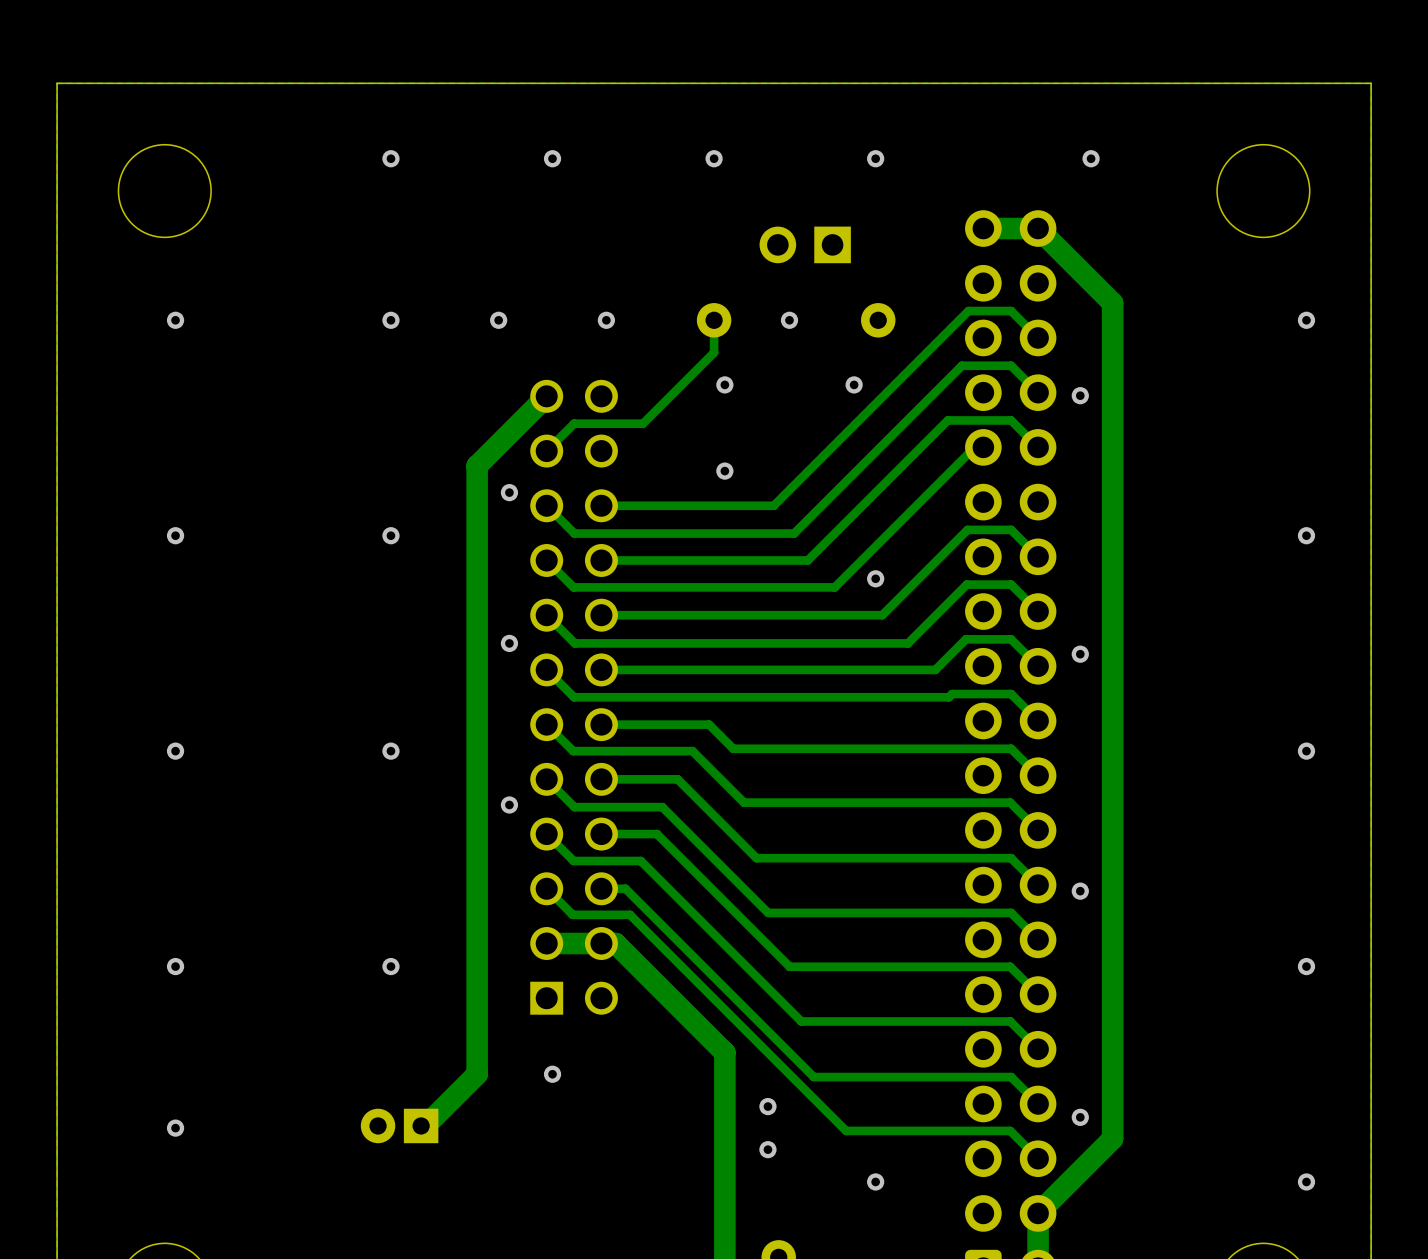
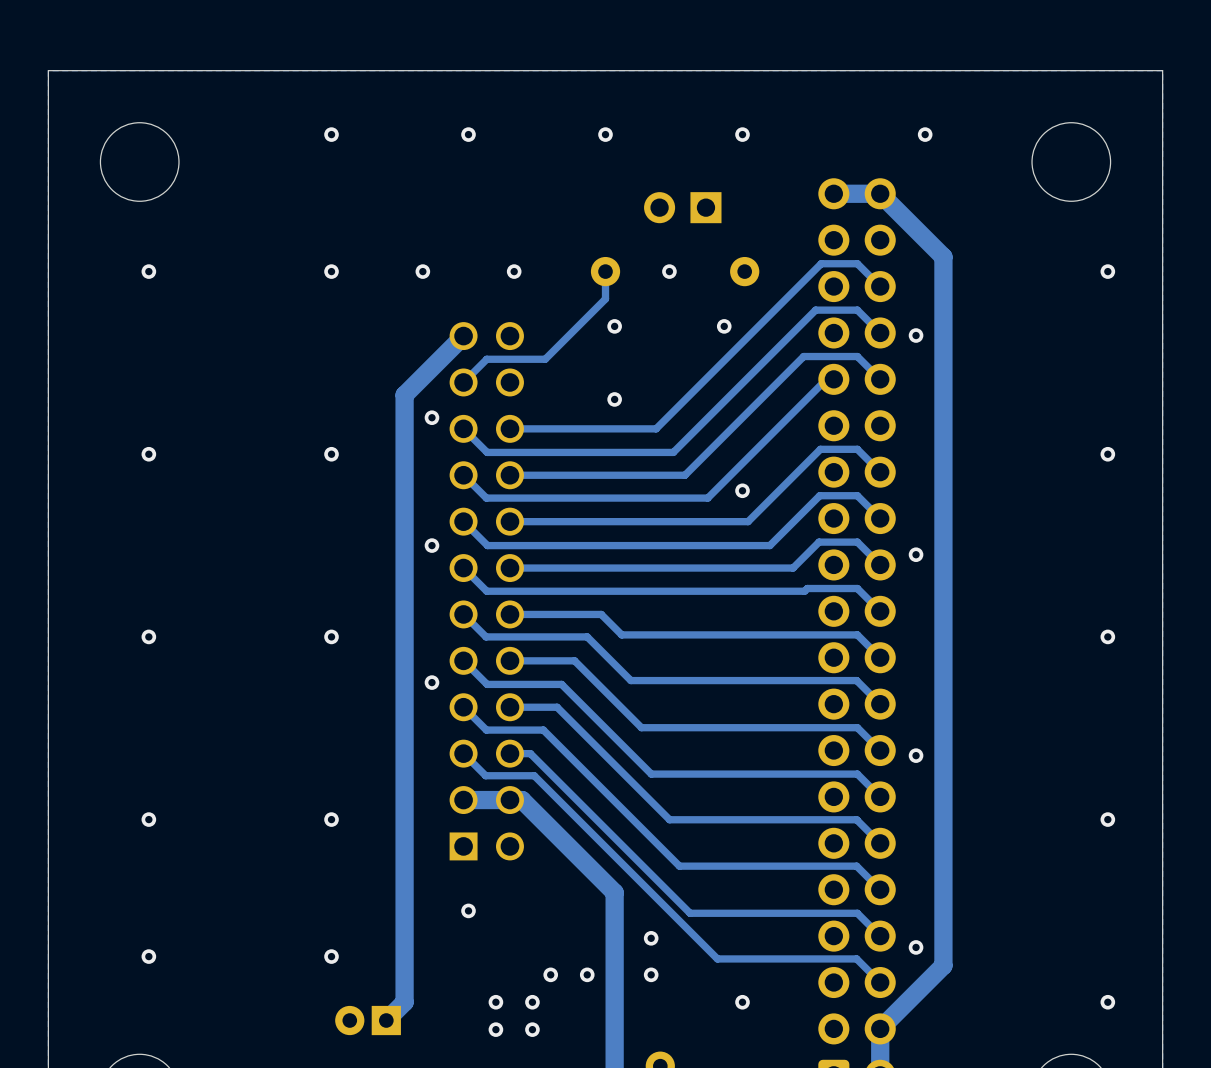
track: (477, 1074) (425, 1125) (421, 1125) -> (404, 910) (404, 1002) (386, 1020)
part position: (399, 1125) -> (368, 1020)
via: none -> (331, 956)
via: none -> (550, 974)
via: none -> (587, 974)
via: none -> (495, 1002)
via: none -> (532, 1002)
via: none -> (495, 1029)
via: none -> (532, 1029)

